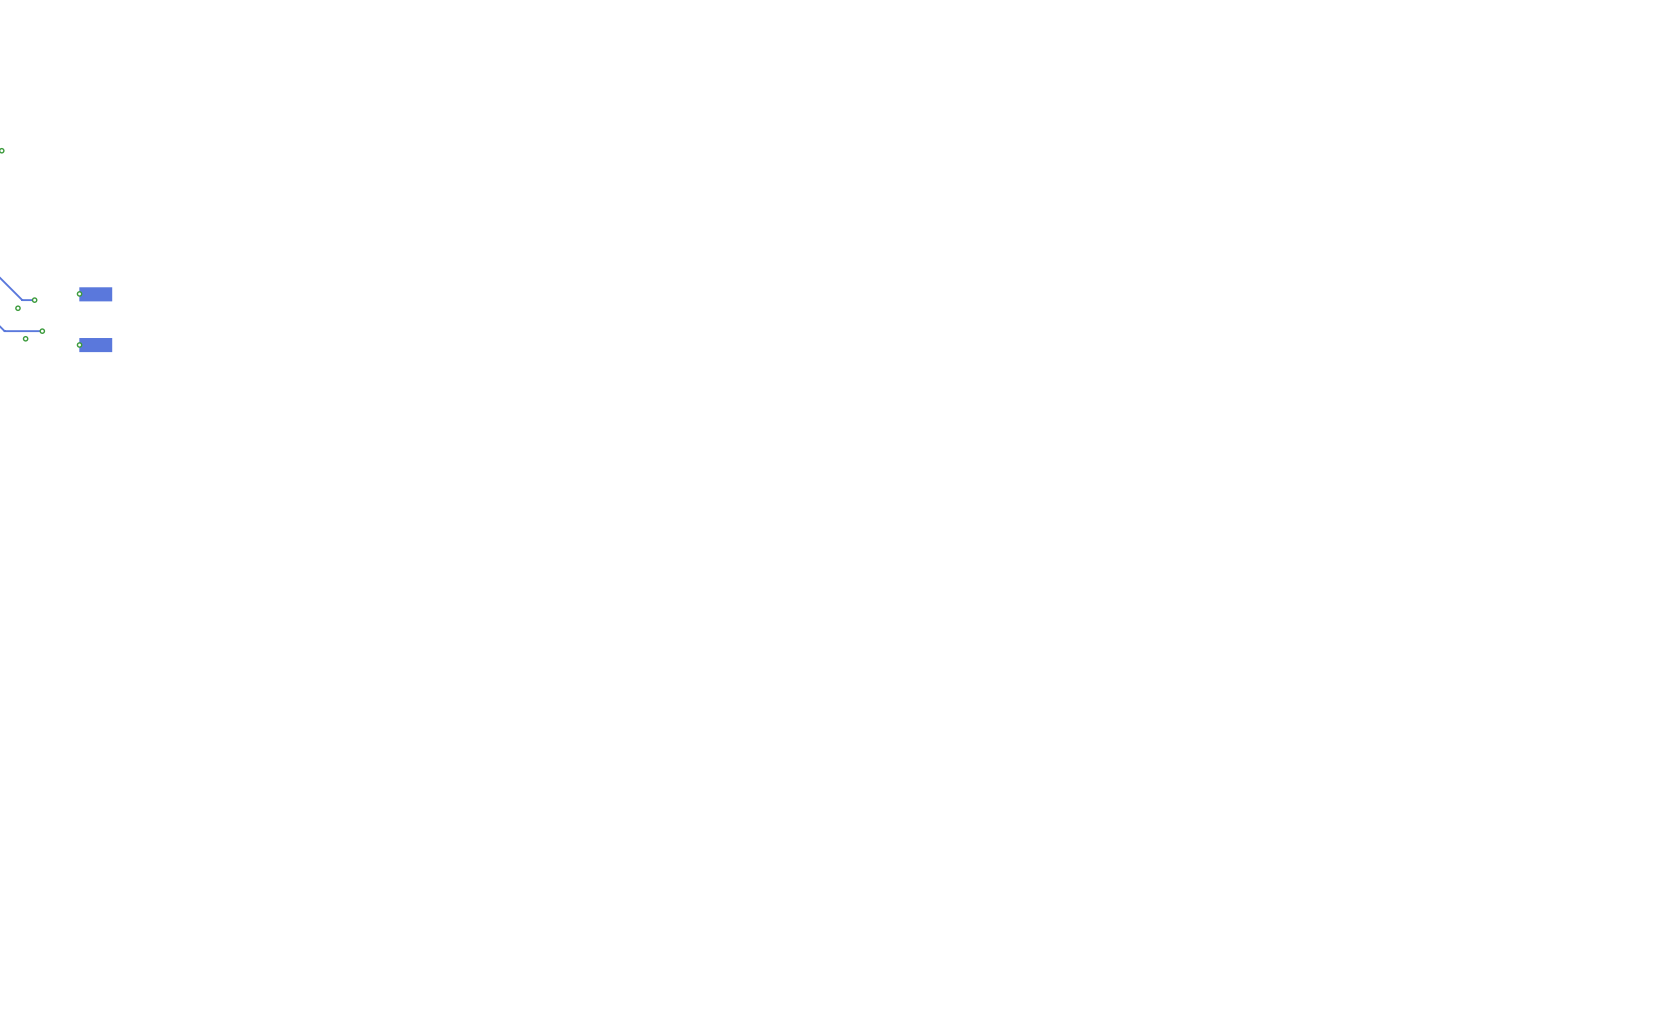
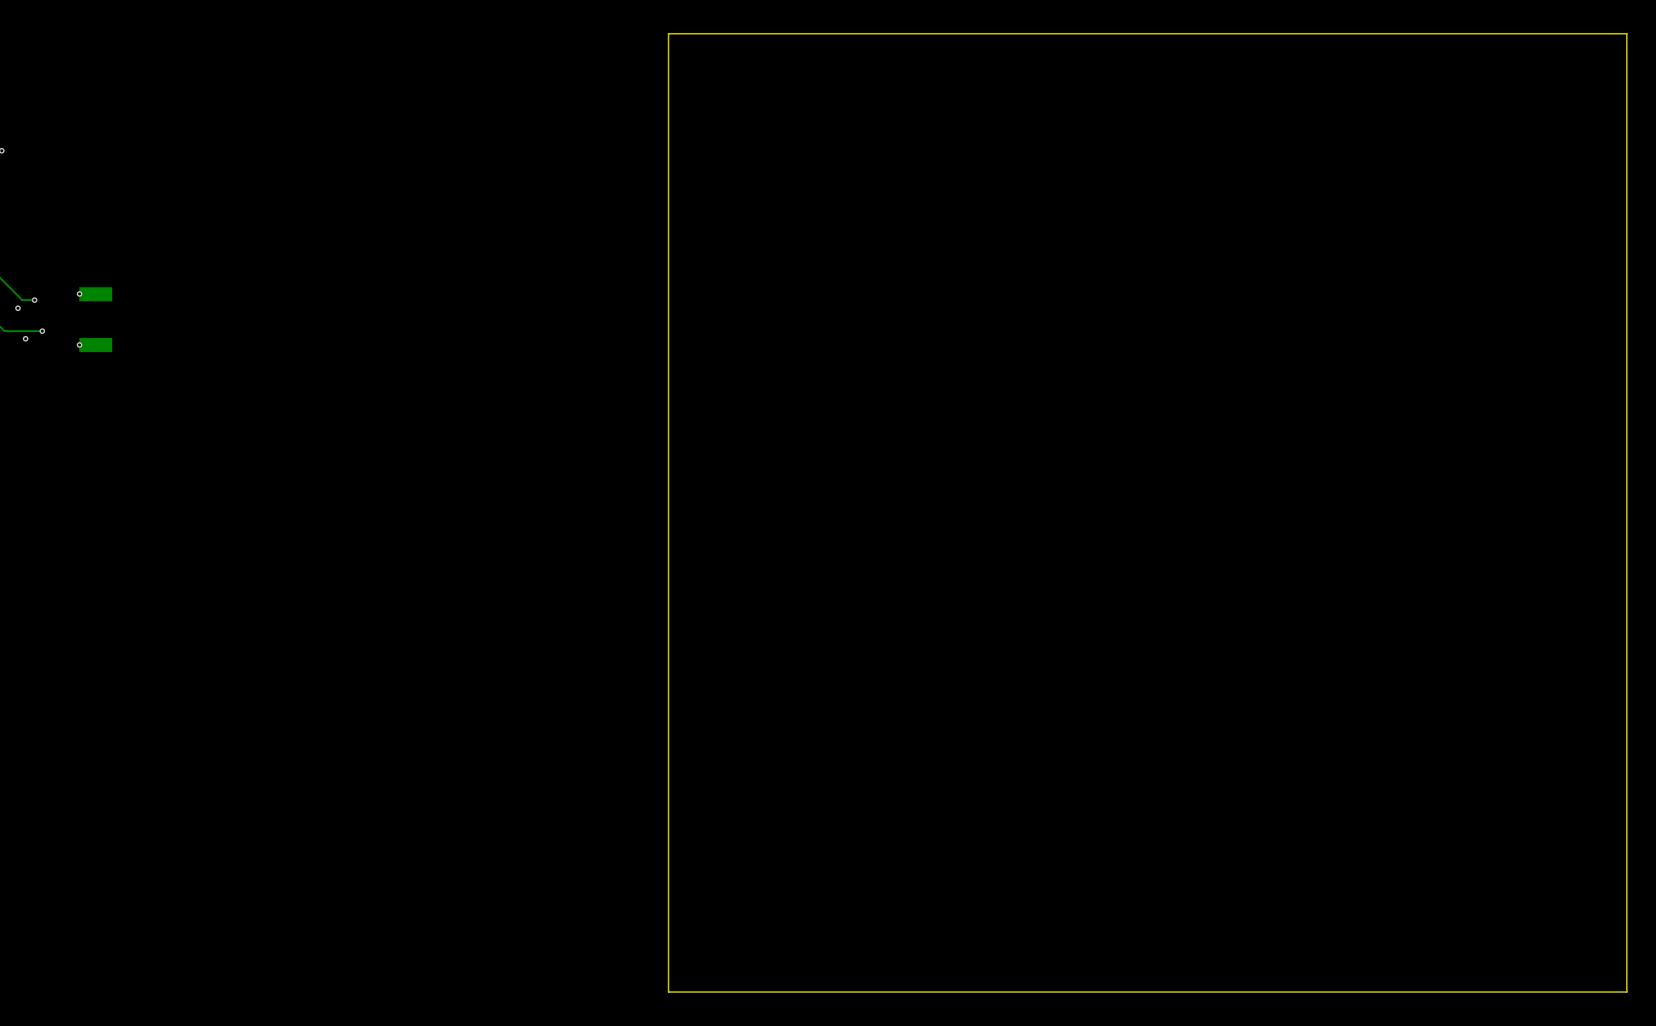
board edge: none -> (1626, 33) (1626, 992) (668, 992) (668, 33) (1626, 33)

